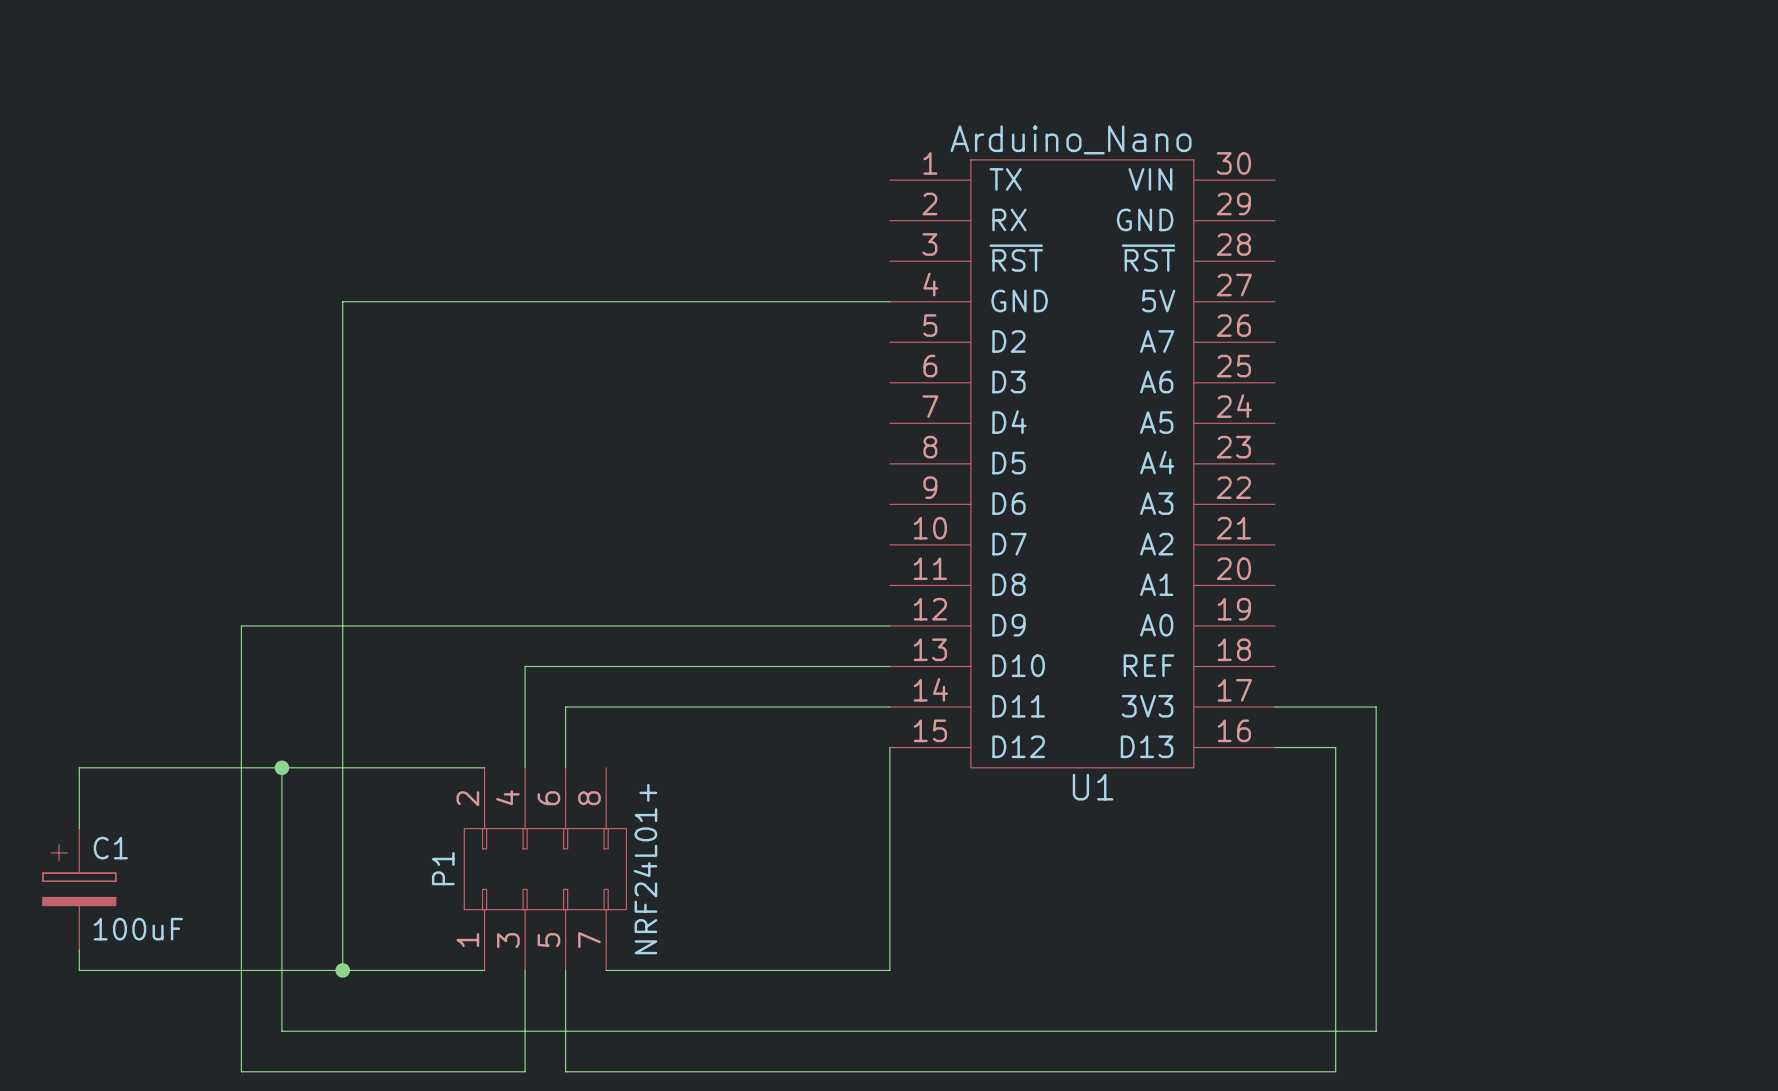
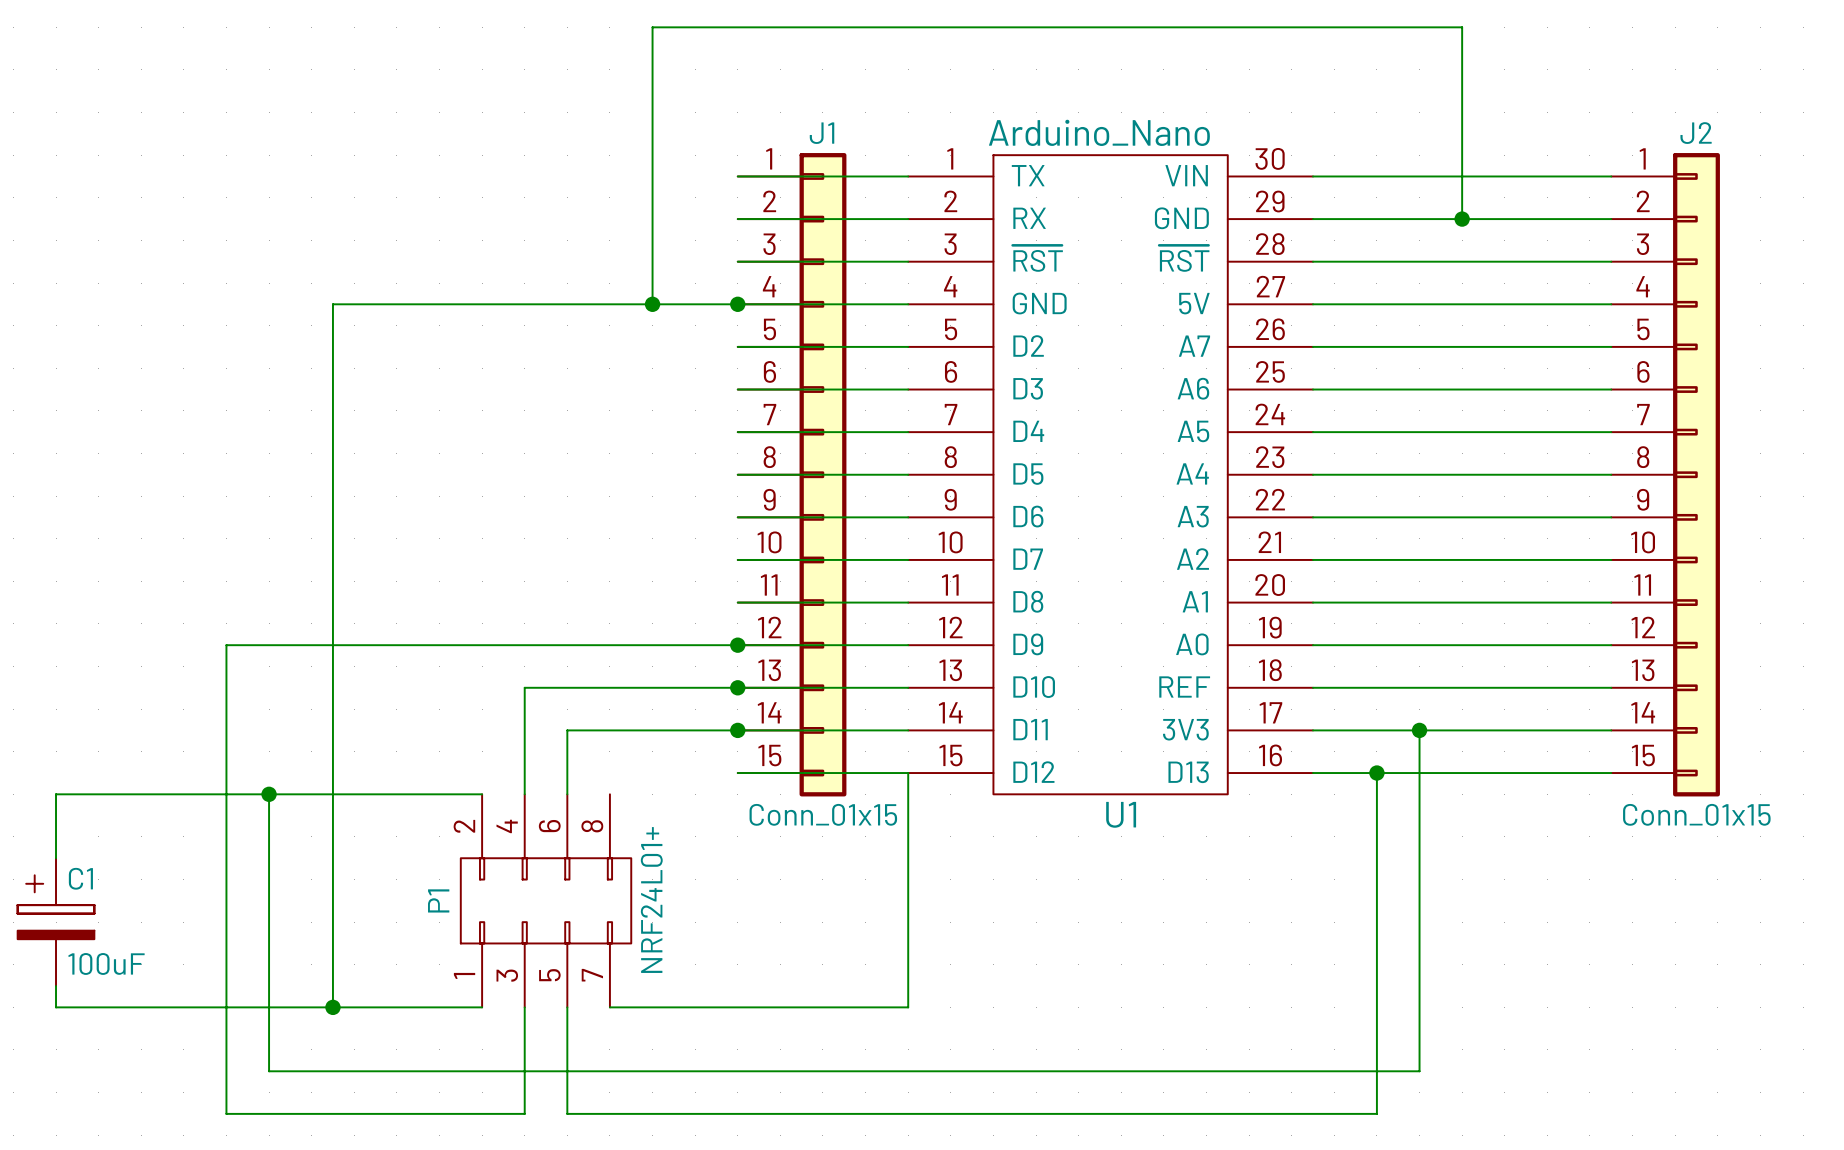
wire: none -> (737, 176) (908, 176)
wire: none -> (1313, 176) (1611, 176)
wire: none -> (737, 219) (908, 219)
wire: none -> (1313, 219) (1611, 219)
wire: none -> (1462, 219) (1462, 27) (652, 27) (652, 304)
junction: none -> (1462, 219)
wire: none -> (737, 261) (908, 261)
wire: none -> (1313, 261) (1611, 261)
junction: none -> (652, 304)
junction: none -> (737, 304)
wire: none -> (1313, 304) (1611, 304)
wire: none -> (737, 346) (908, 346)
wire: none -> (1313, 346) (1611, 346)
wire: none -> (737, 389) (908, 389)
wire: none -> (1313, 389) (1611, 389)
wire: none -> (737, 432) (908, 432)
wire: none -> (1313, 432) (1611, 432)
wire: none -> (737, 474) (908, 474)
J1: none -> Conn_01x15 (792, 474)
wire: none -> (1313, 474) (1611, 474)
J2: none -> Conn_01x15 (1665, 474)
wire: none -> (737, 517) (908, 517)
wire: none -> (1313, 517) (1611, 517)
wire: none -> (737, 559) (908, 559)
wire: none -> (1313, 559) (1611, 559)
wire: none -> (737, 602) (908, 602)
wire: none -> (1313, 602) (1611, 602)
junction: none -> (737, 645)
wire: none -> (1313, 645) (1611, 645)
junction: none -> (737, 687)
wire: none -> (1313, 687) (1611, 687)
junction: none -> (737, 730)
wire: none -> (1419, 730) (1611, 730)
junction: none -> (1419, 730)
wire: none -> (737, 773) (908, 773)
wire: none -> (1376, 773) (1611, 773)
junction: none -> (1376, 773)

